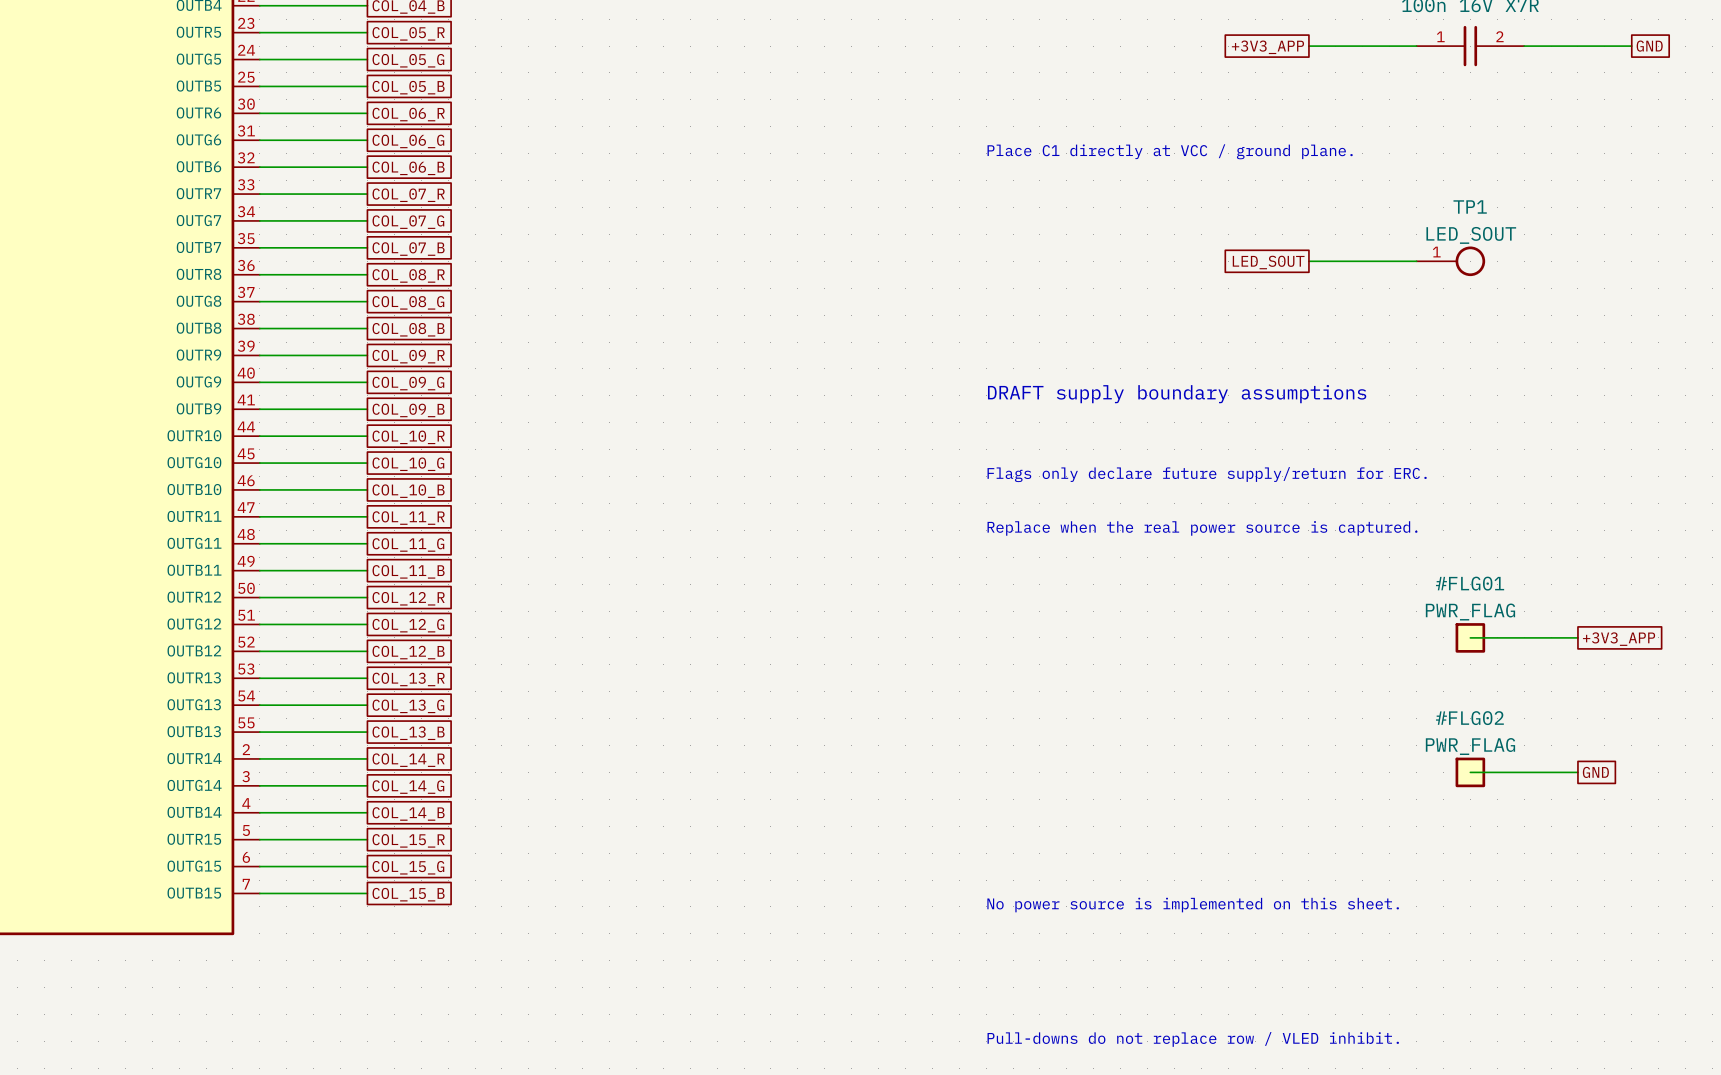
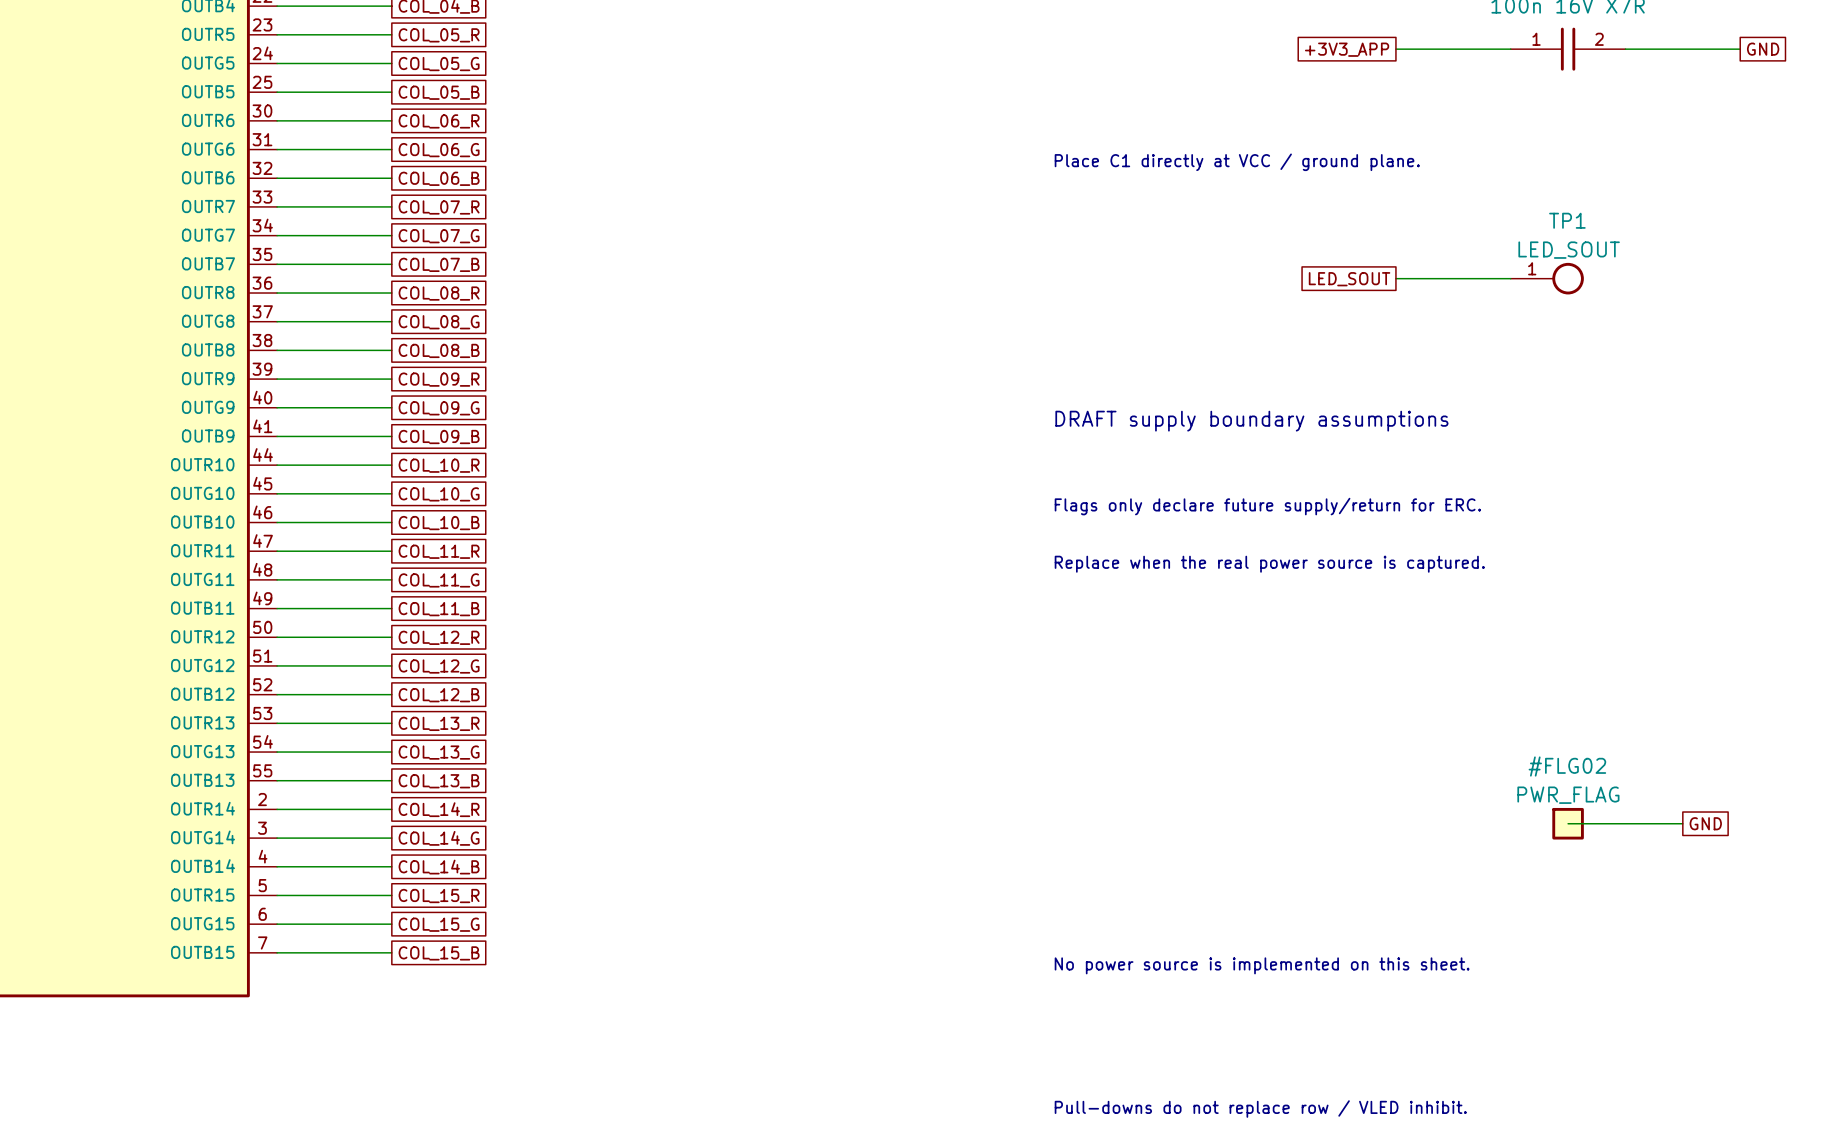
wire: (1470, 637) (1577, 637) -> none
#FLG01: PWR_FLAG (1470, 637) -> none
global label: +3V3_APP (1619, 639) -> none

